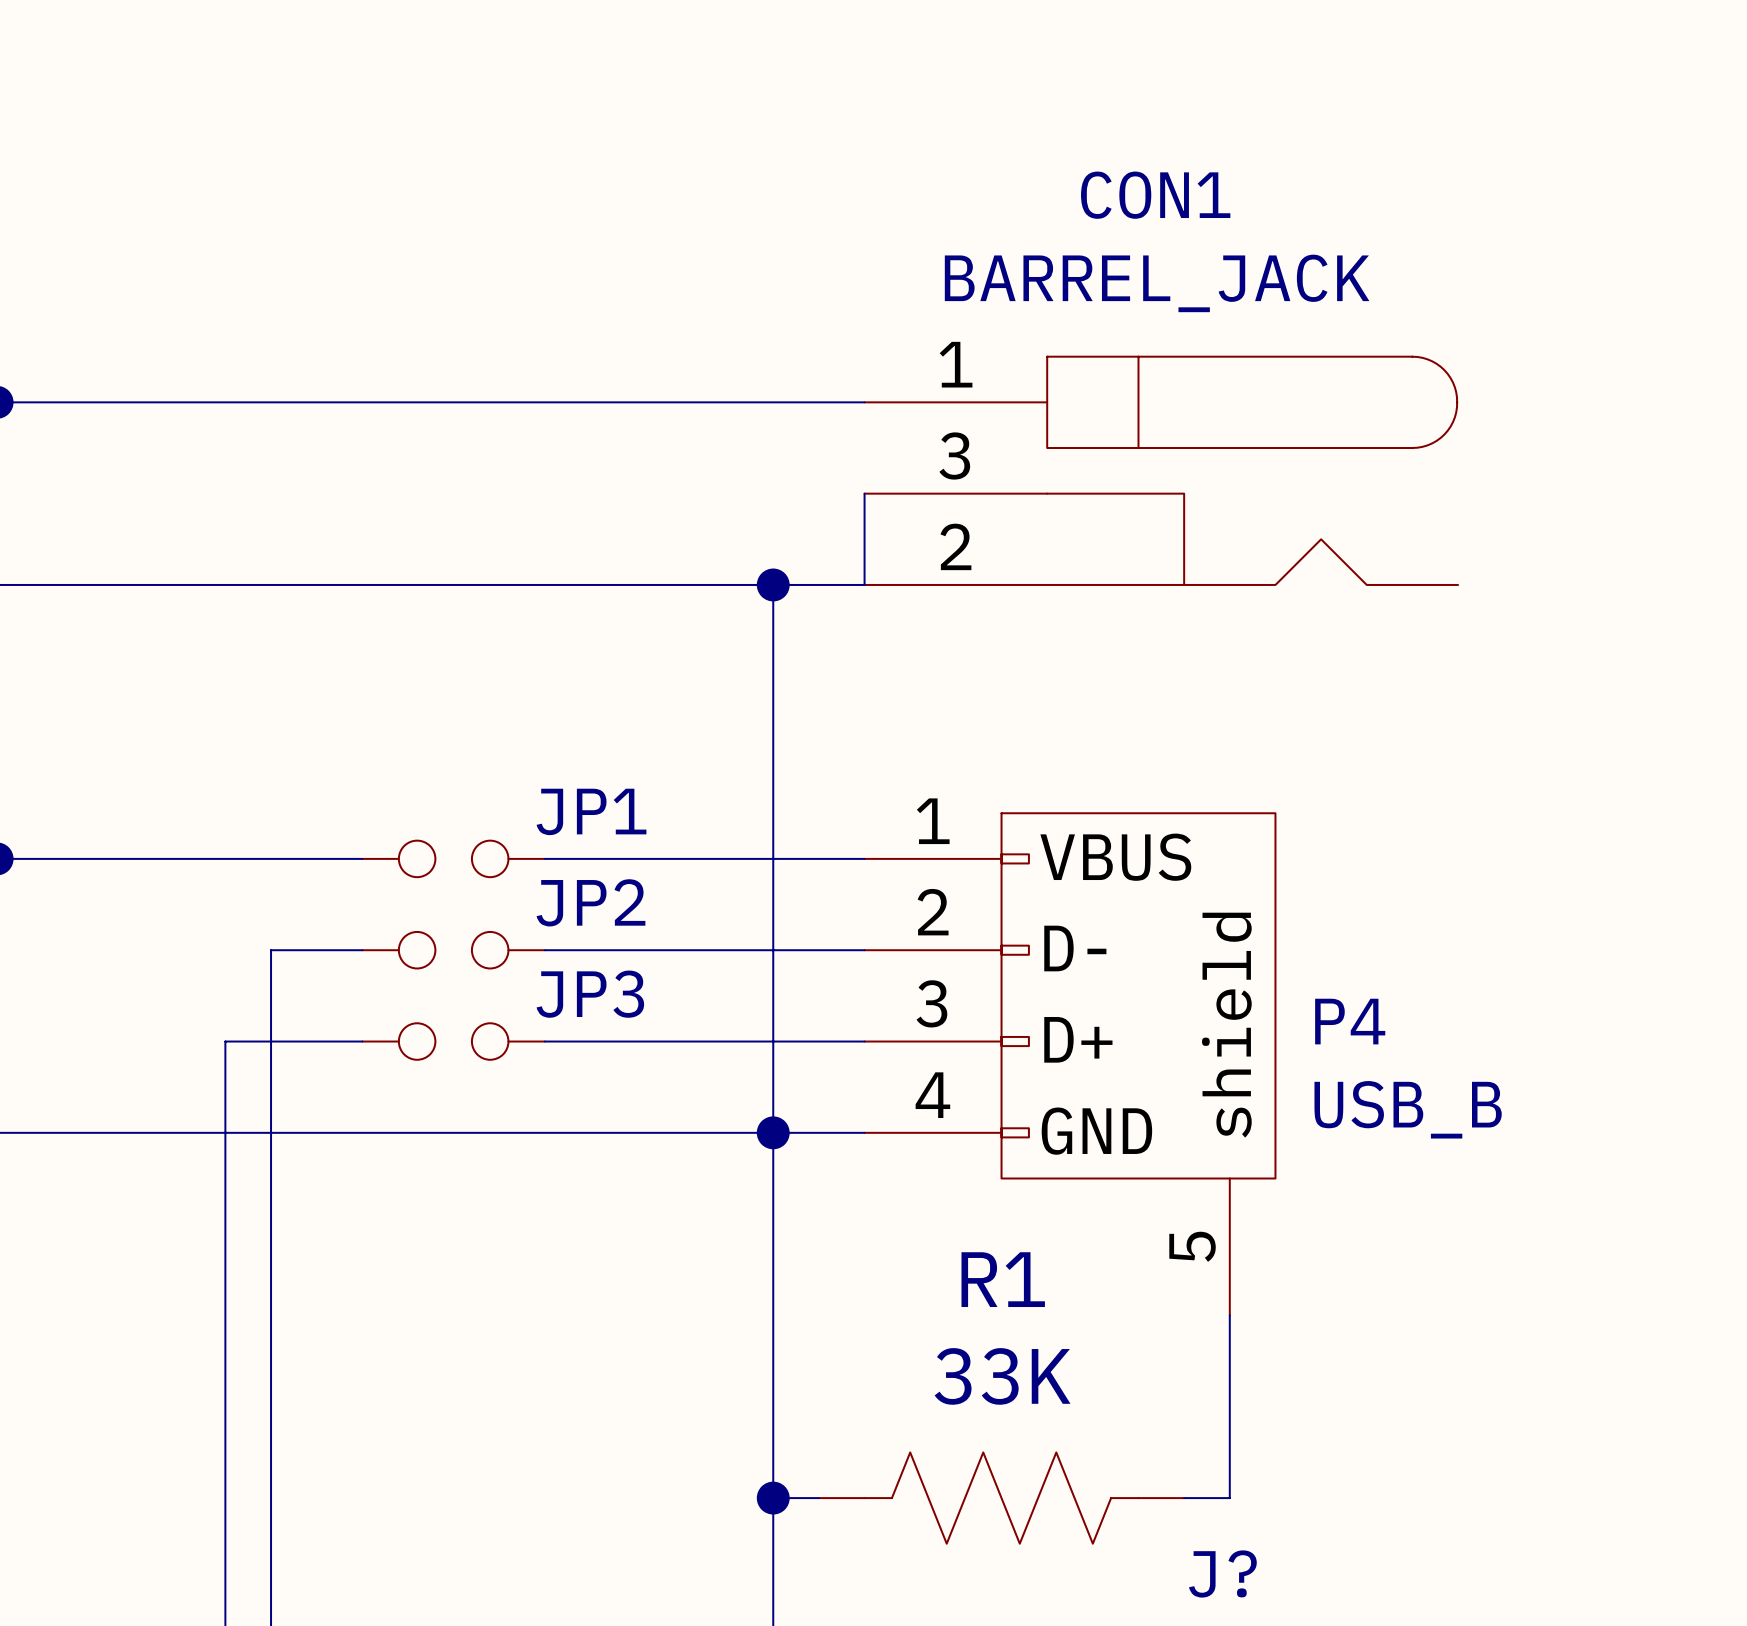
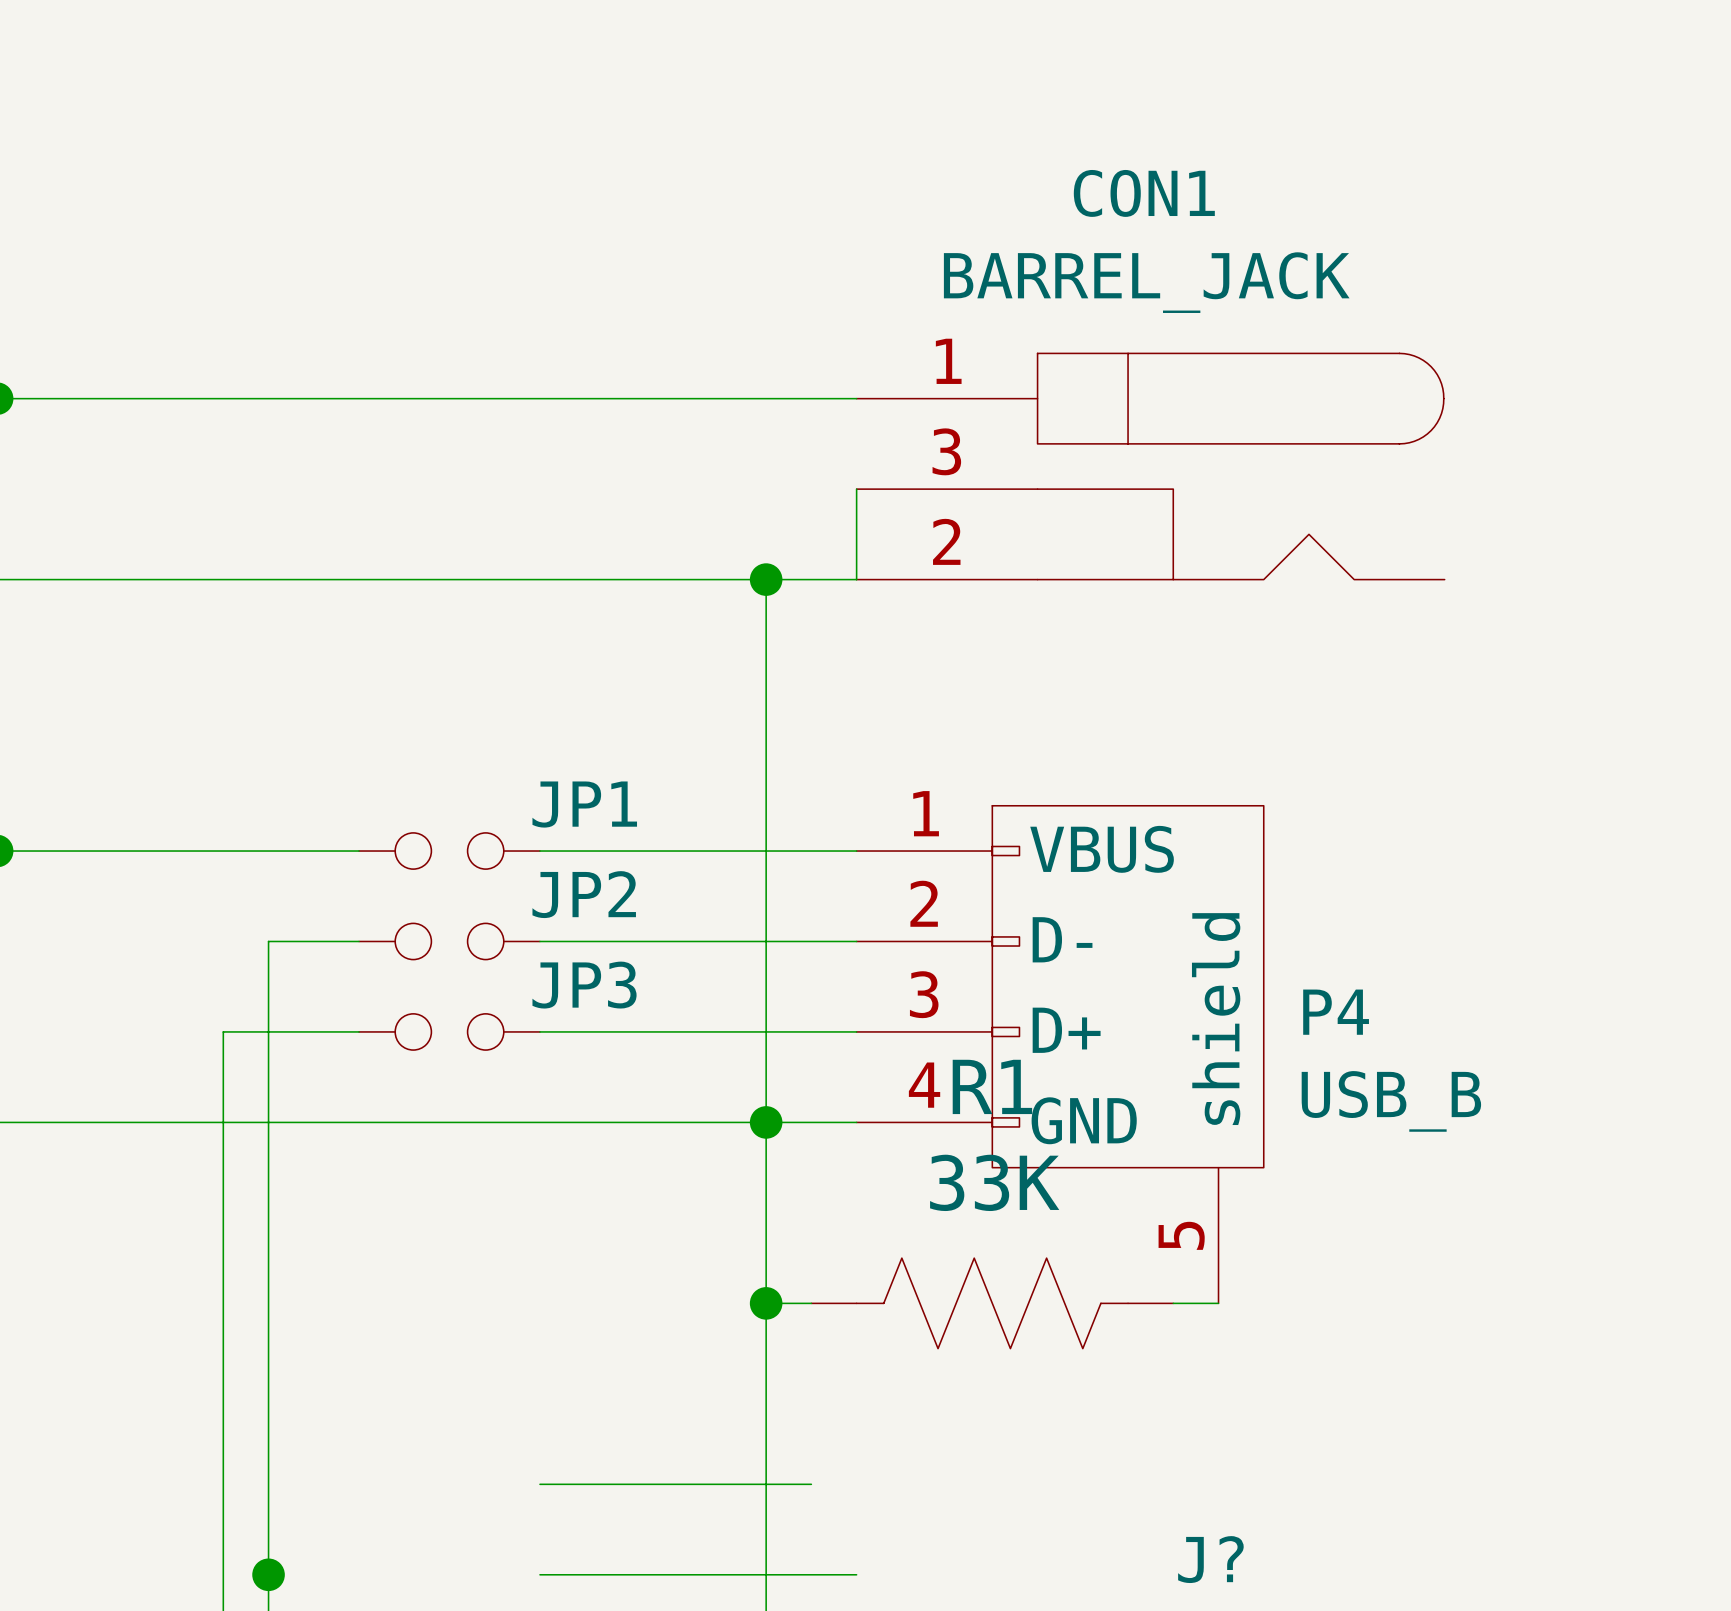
wire: none -> (766, 1303) (811, 1303)
junction: none -> (766, 1303)
wire: (1229, 1315) (1229, 1498) (1184, 1498) -> (1218, 1303) (1173, 1303)
wire: none -> (539, 1484) (766, 1484)
junction: (773, 1498) -> none
R1 position: (1001, 1498) -> (992, 1303)
junction: none -> (268, 1574)
wire: none -> (539, 1574) (856, 1574)

